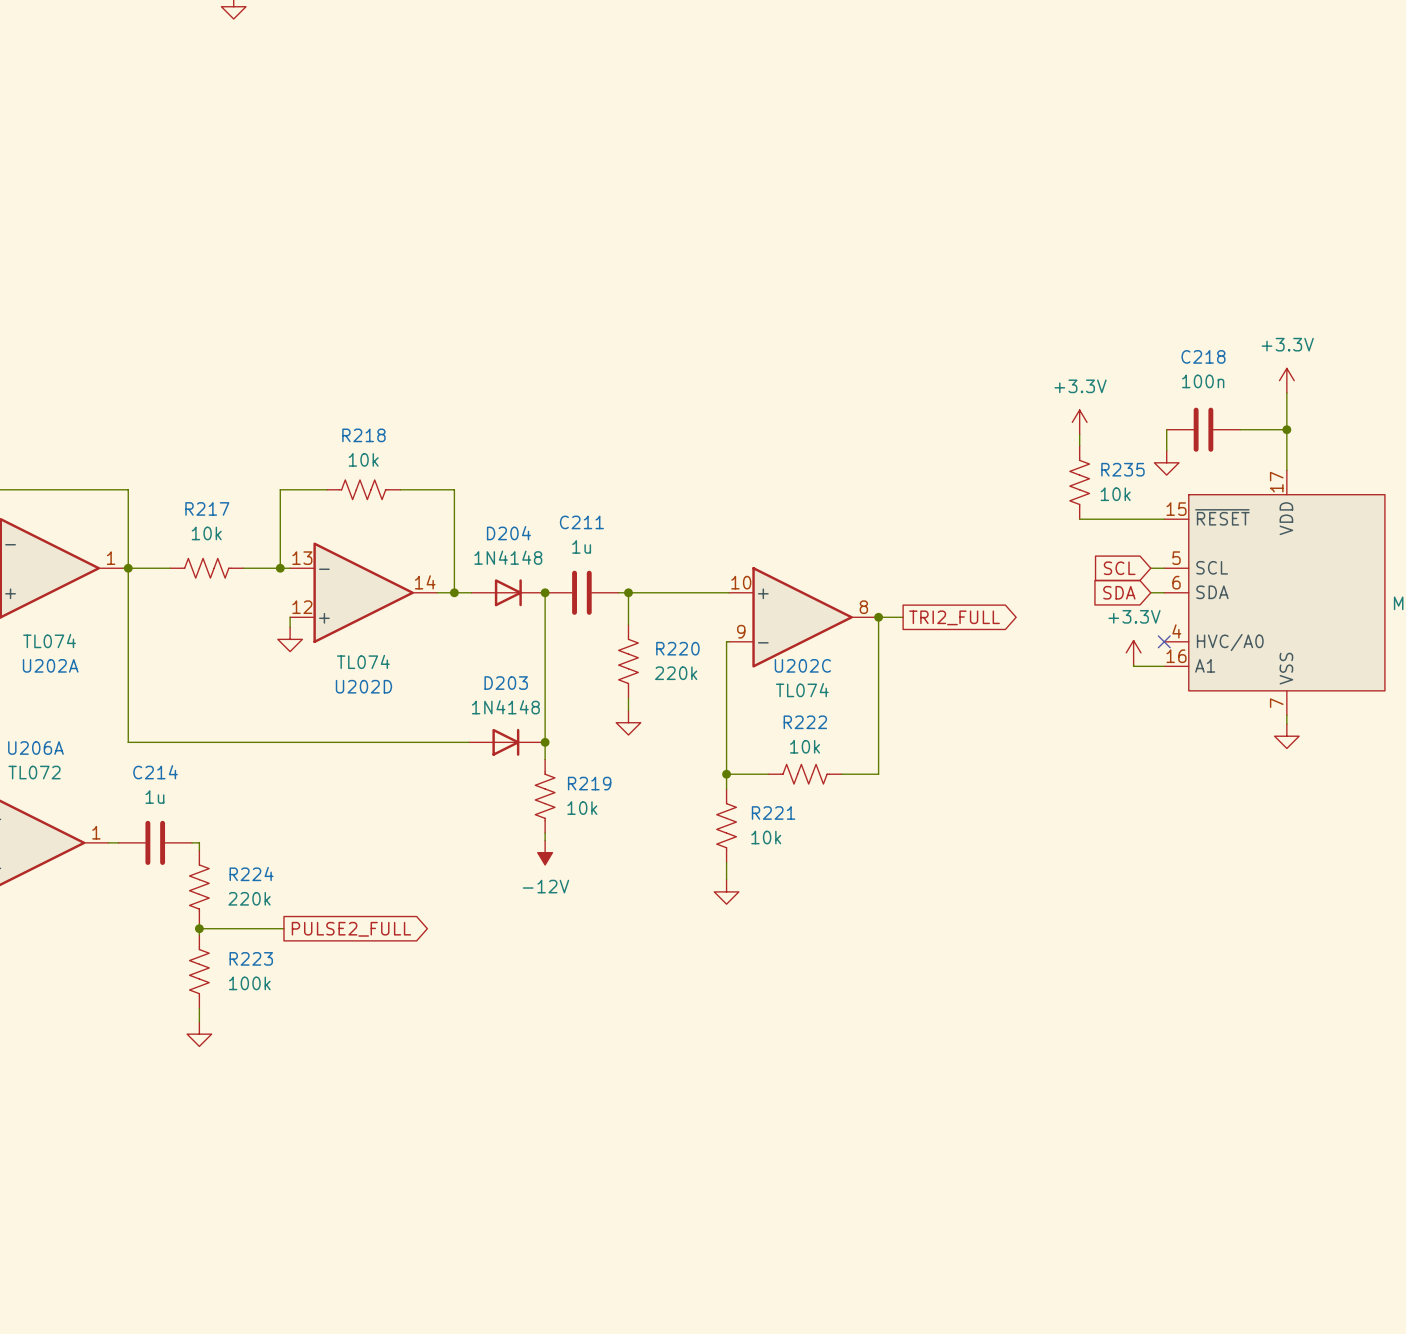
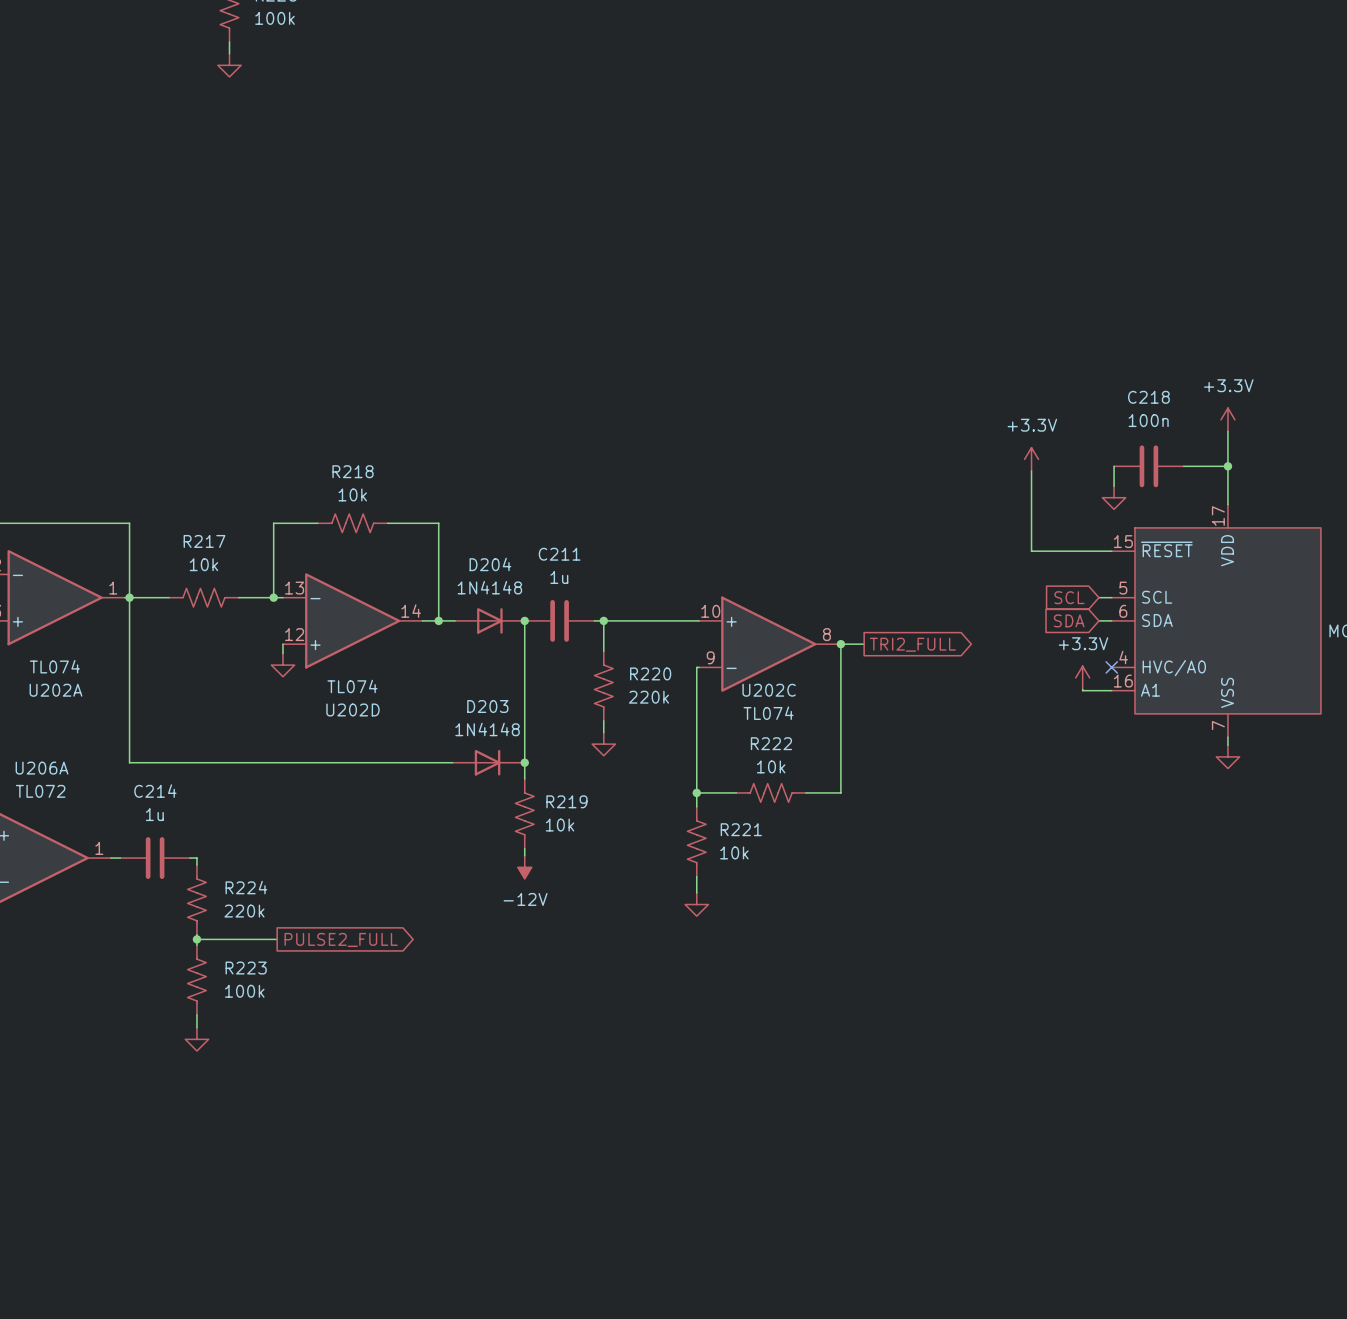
R235: 10k (1079, 482) -> none

